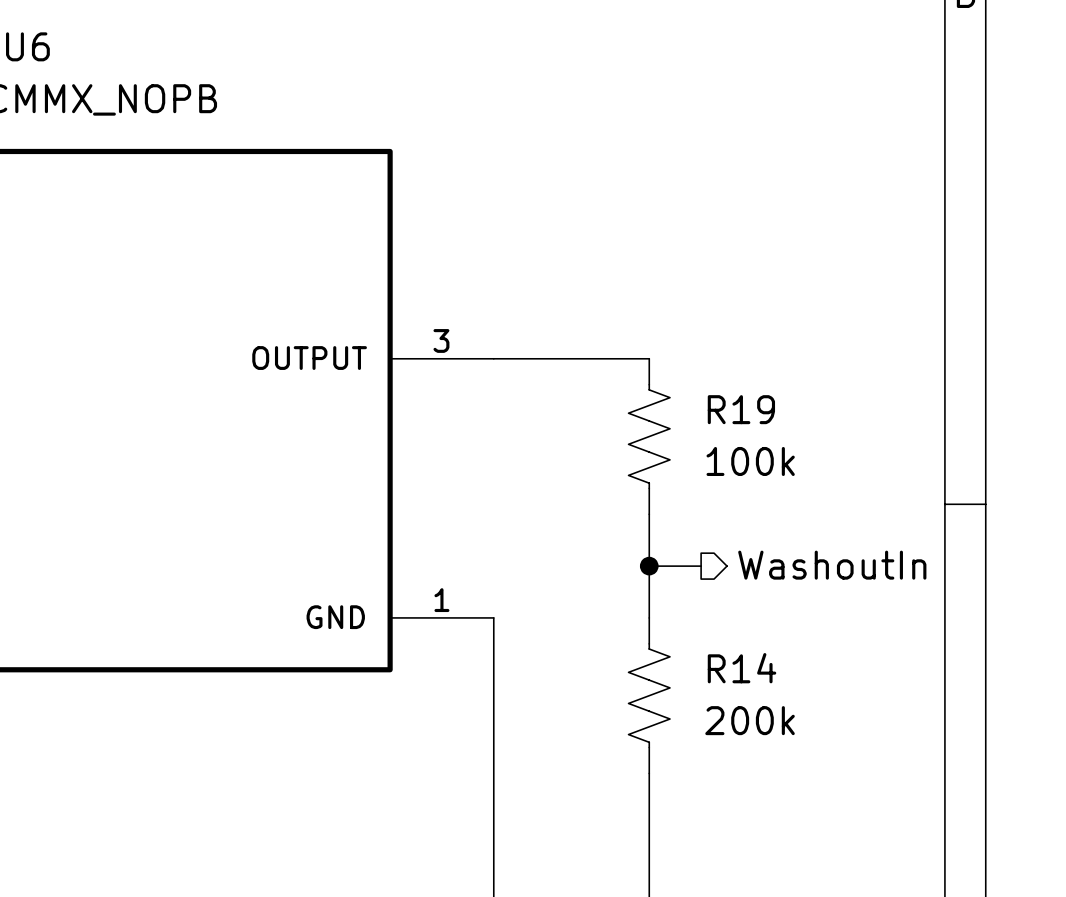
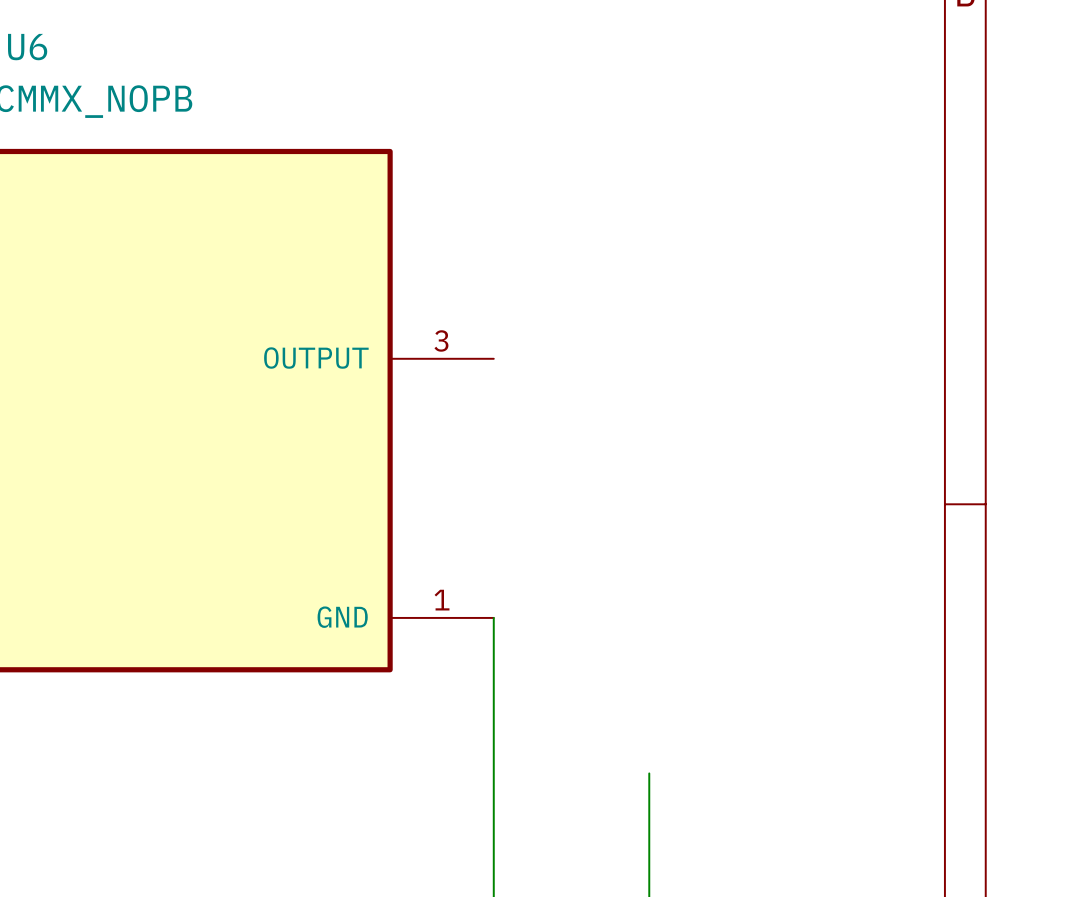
wire: (493, 358) (649, 358) -> none
R19: 100k (649, 436) -> none
wire: (649, 514) (649, 617) -> none
hierarchical label: WashoutIn (832, 565) -> none
wire: (649, 566) (701, 566) -> none
junction: (649, 566) -> none
R14: 200k (649, 695) -> none

